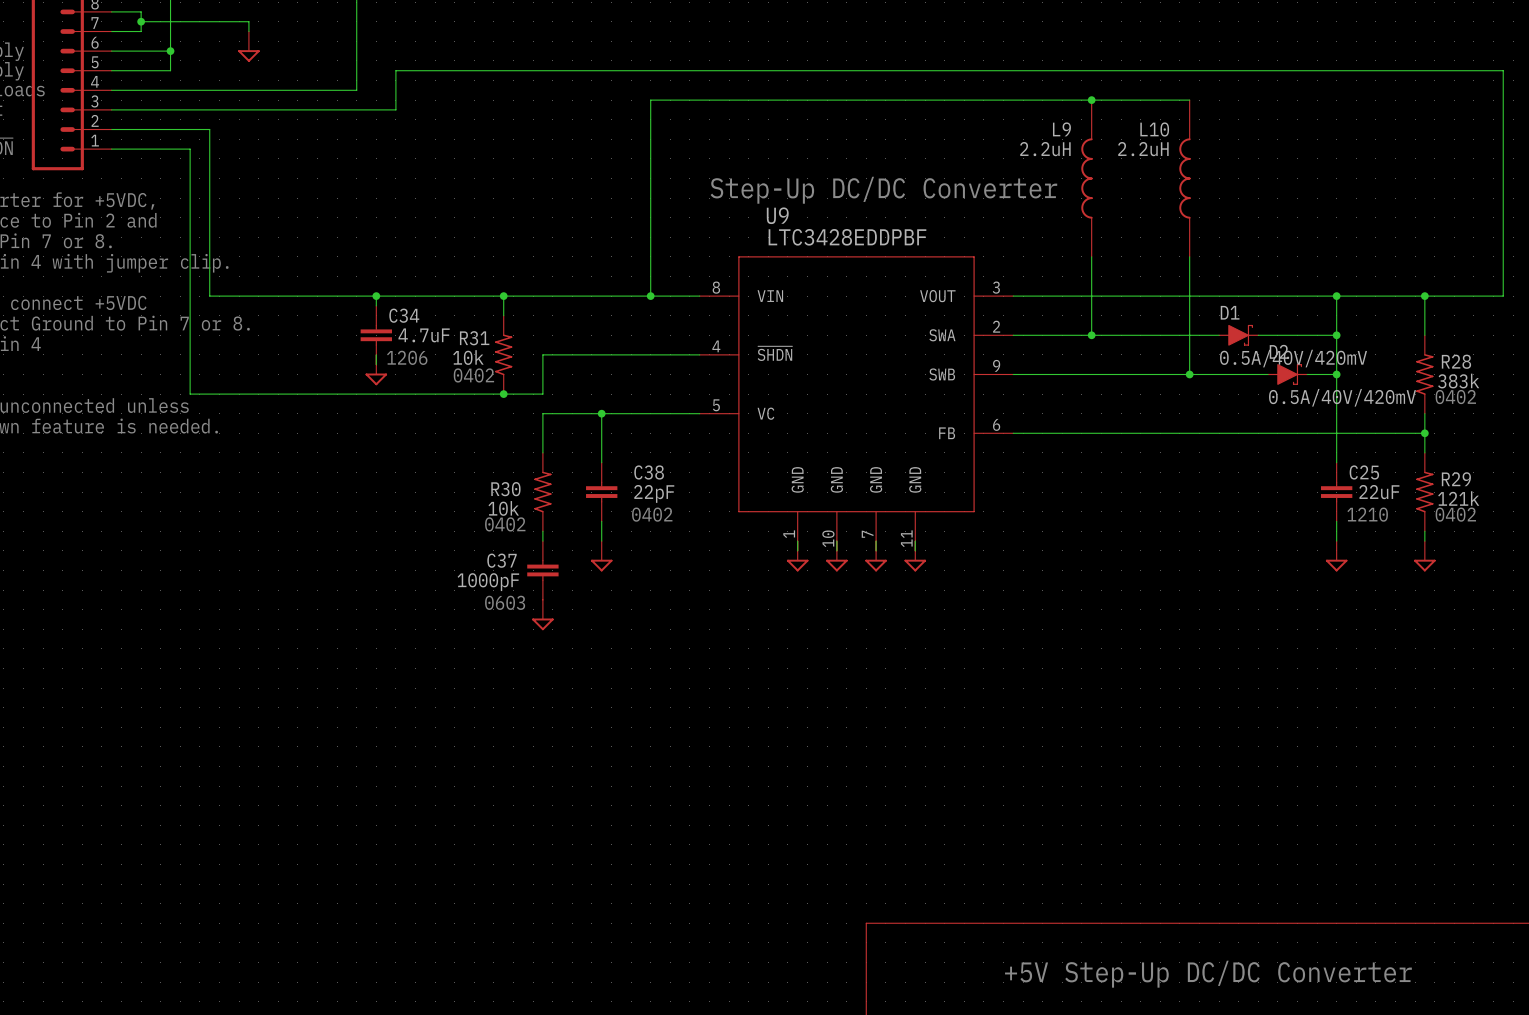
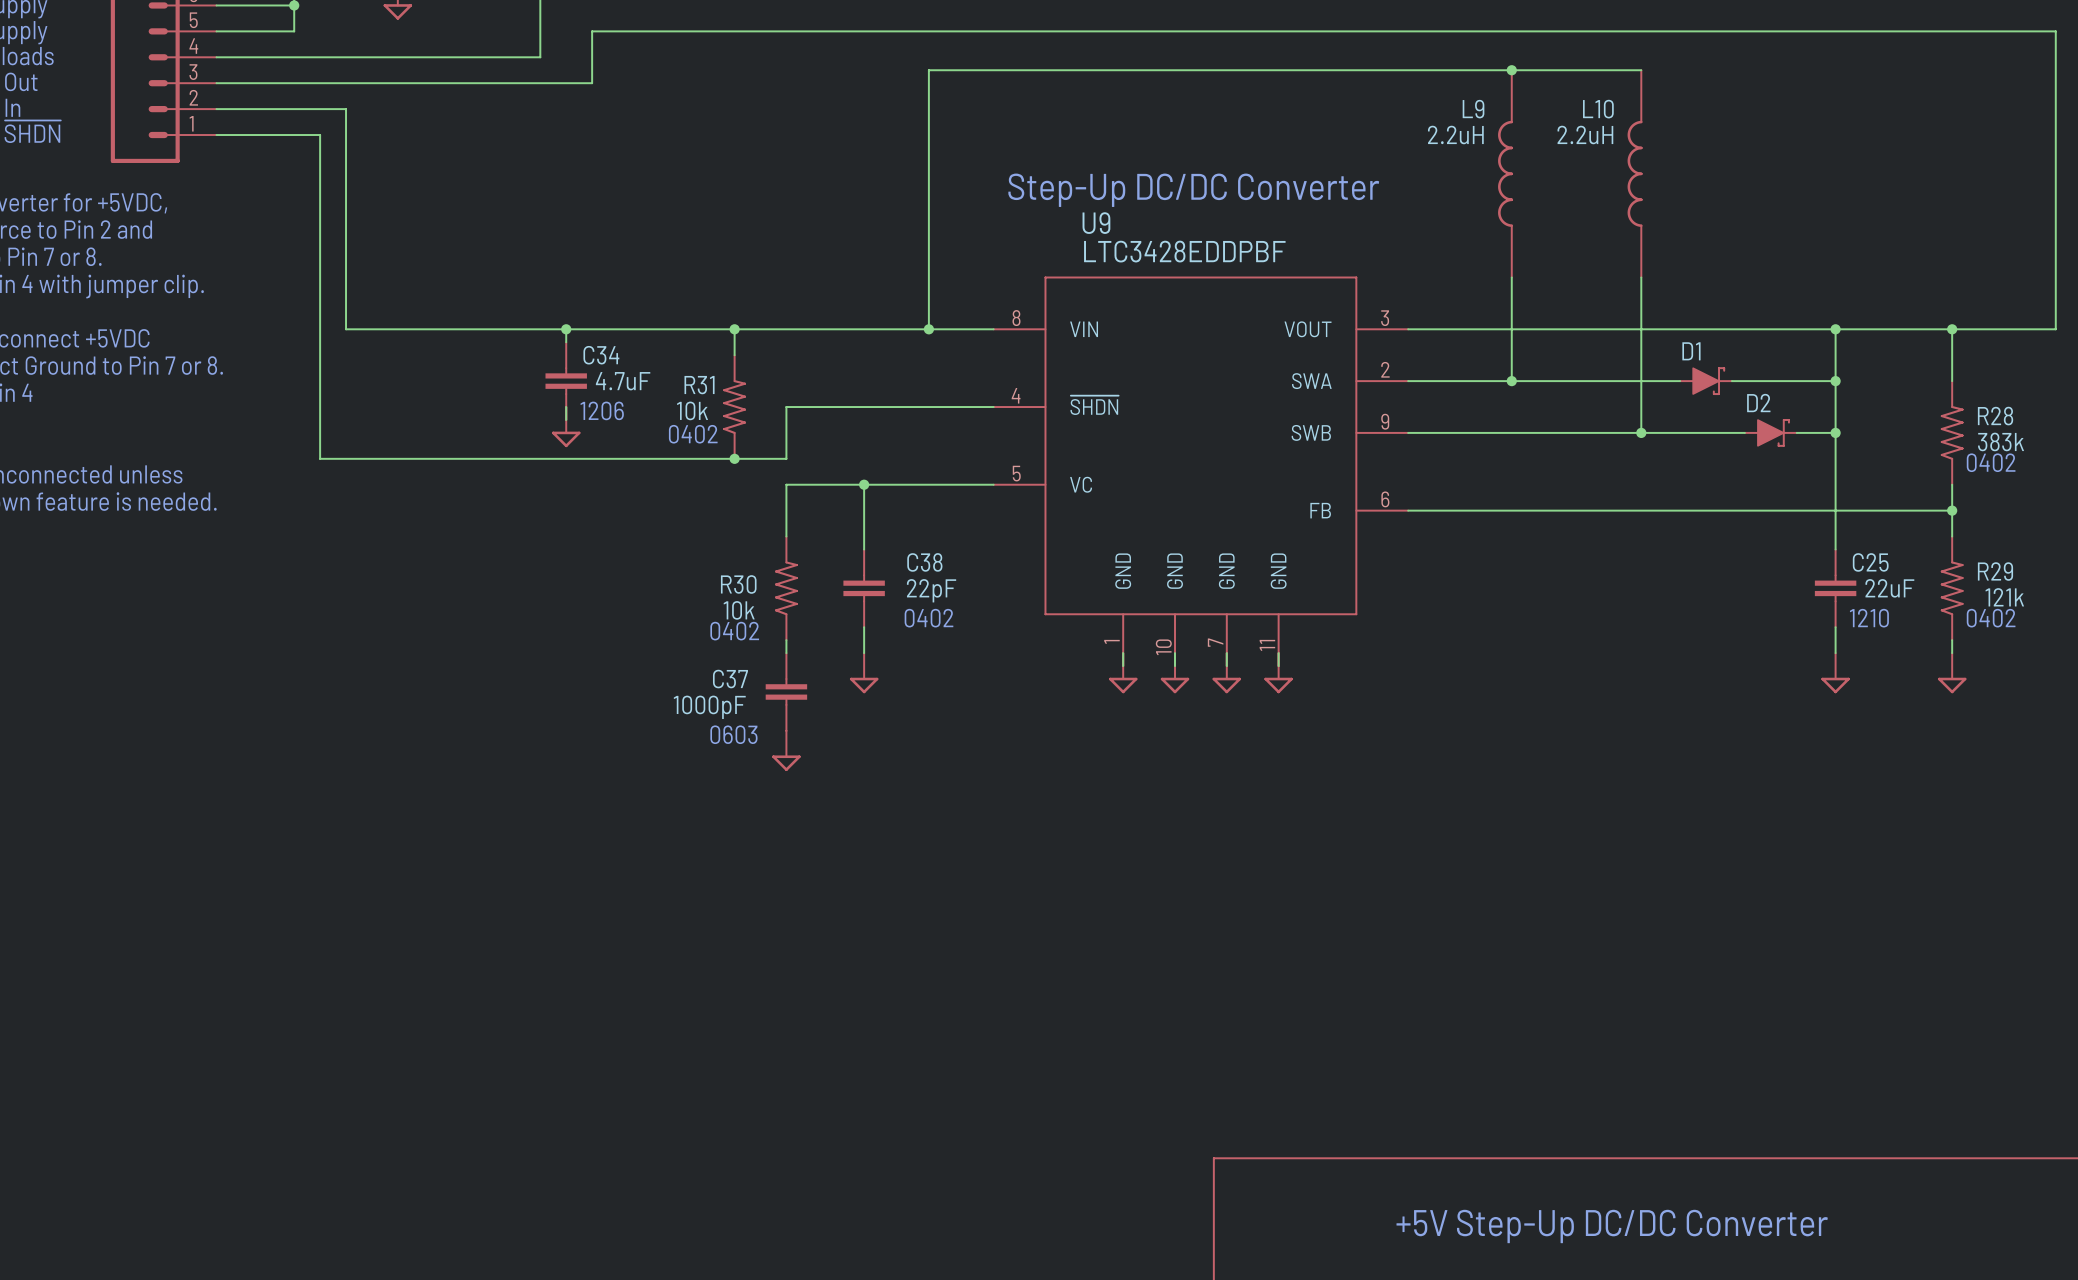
D1 value: 0.5A/40V/420mV (1293, 358) -> none
D2 value: 0.5A/40V/420mV (1342, 397) -> none

